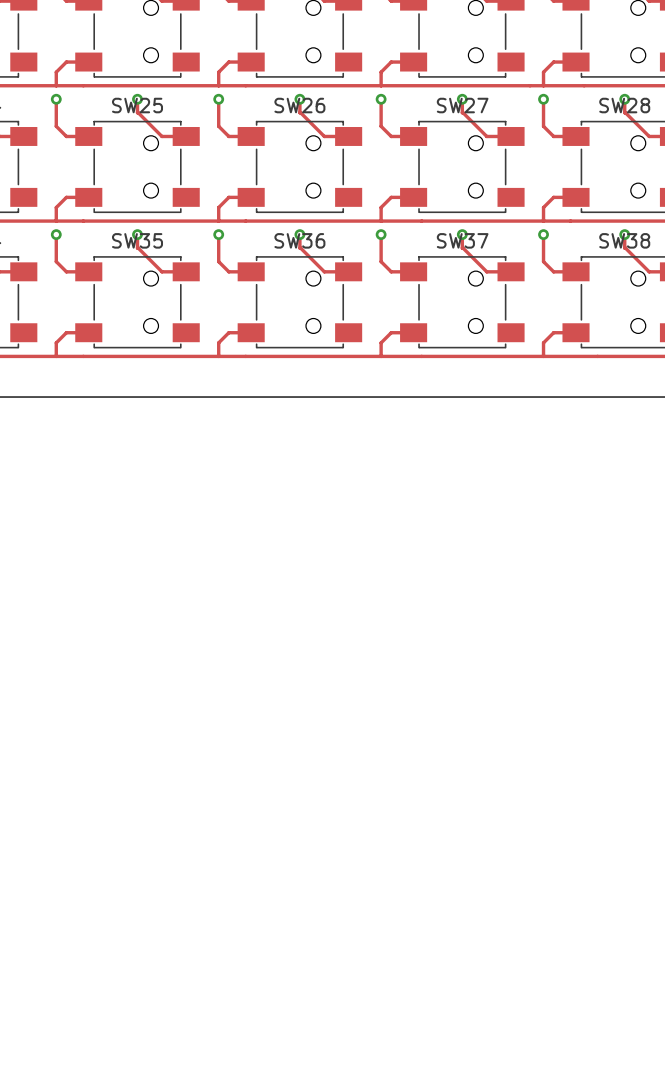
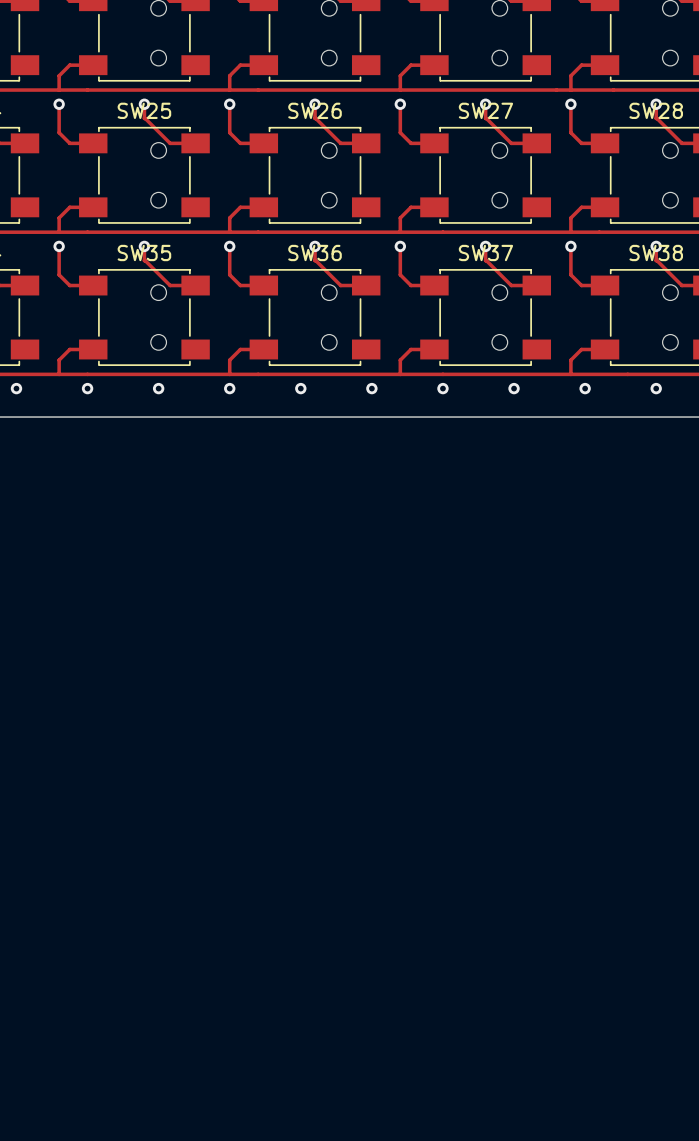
via: none -> (16, 388)
via: none -> (87, 388)
via: none -> (158, 388)
via: none -> (229, 388)
via: none -> (300, 388)
via: none -> (371, 388)
via: none -> (442, 388)
via: none -> (514, 388)
via: none -> (585, 388)
via: none -> (656, 388)

